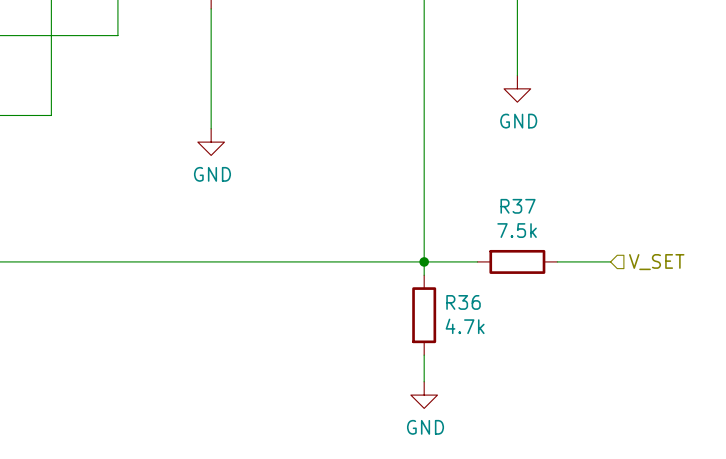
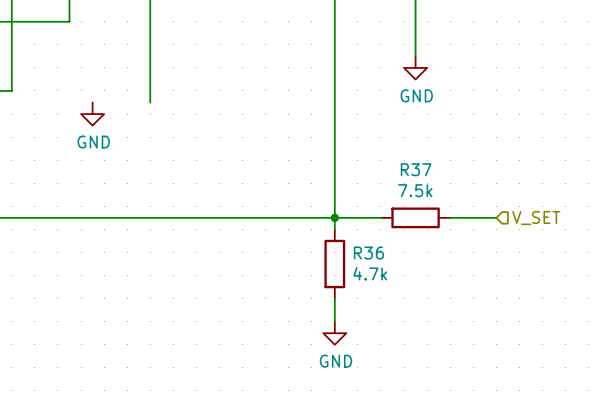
power symbol position: GND (211, 142) -> GND (92, 114)

